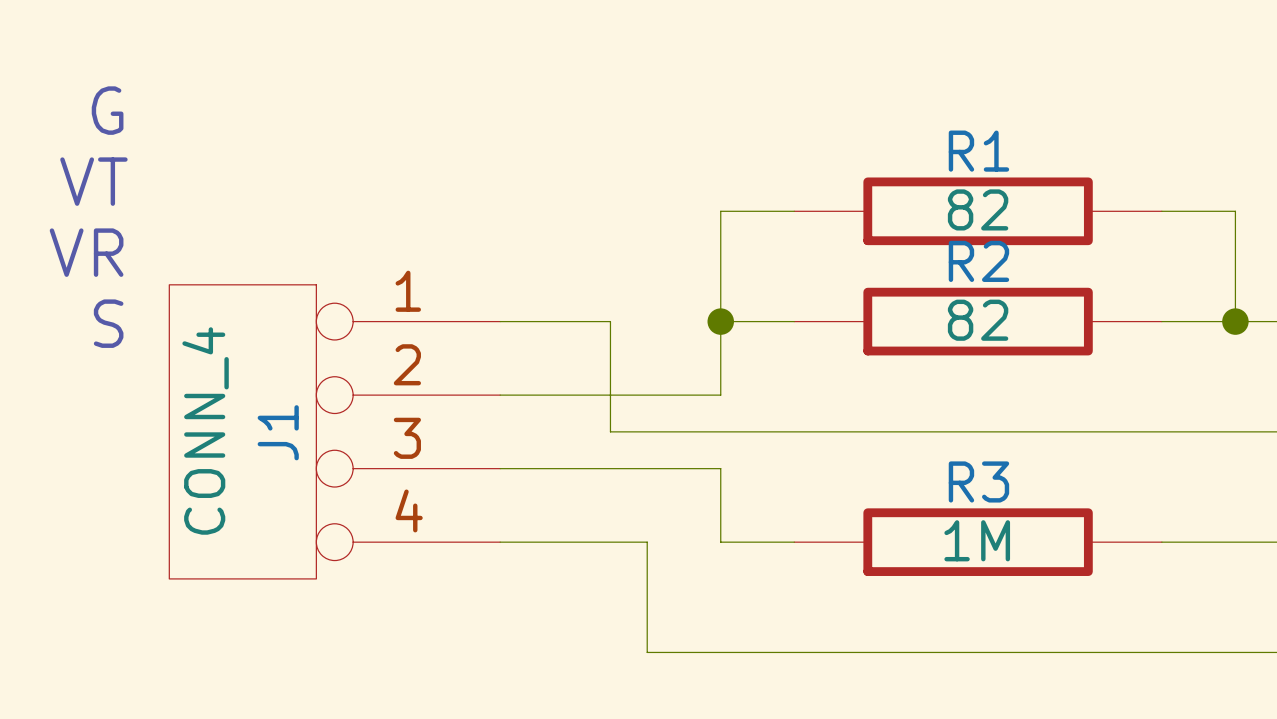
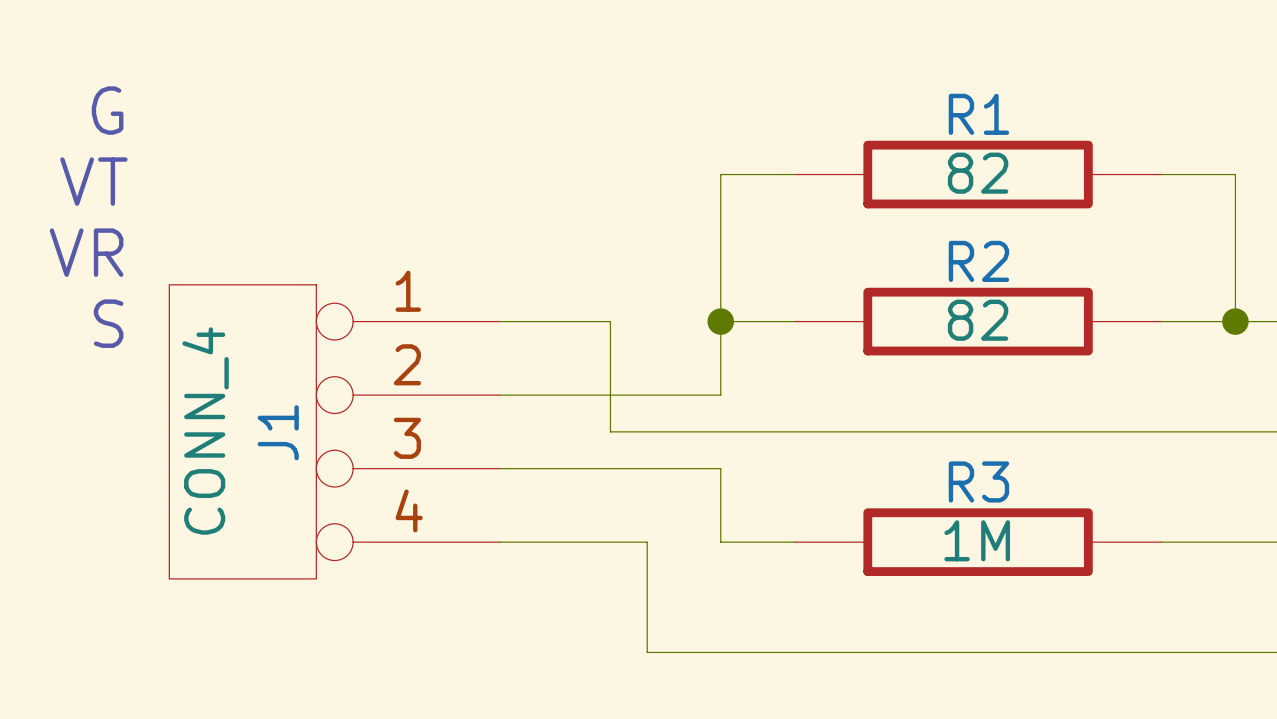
wire: (720, 211) (794, 211) -> (720, 211) (720, 174) (794, 174)
R1 position: (978, 211) -> (978, 174)
wire: (1161, 211) (1235, 211) -> (1161, 174) (1235, 174) (1235, 211)

